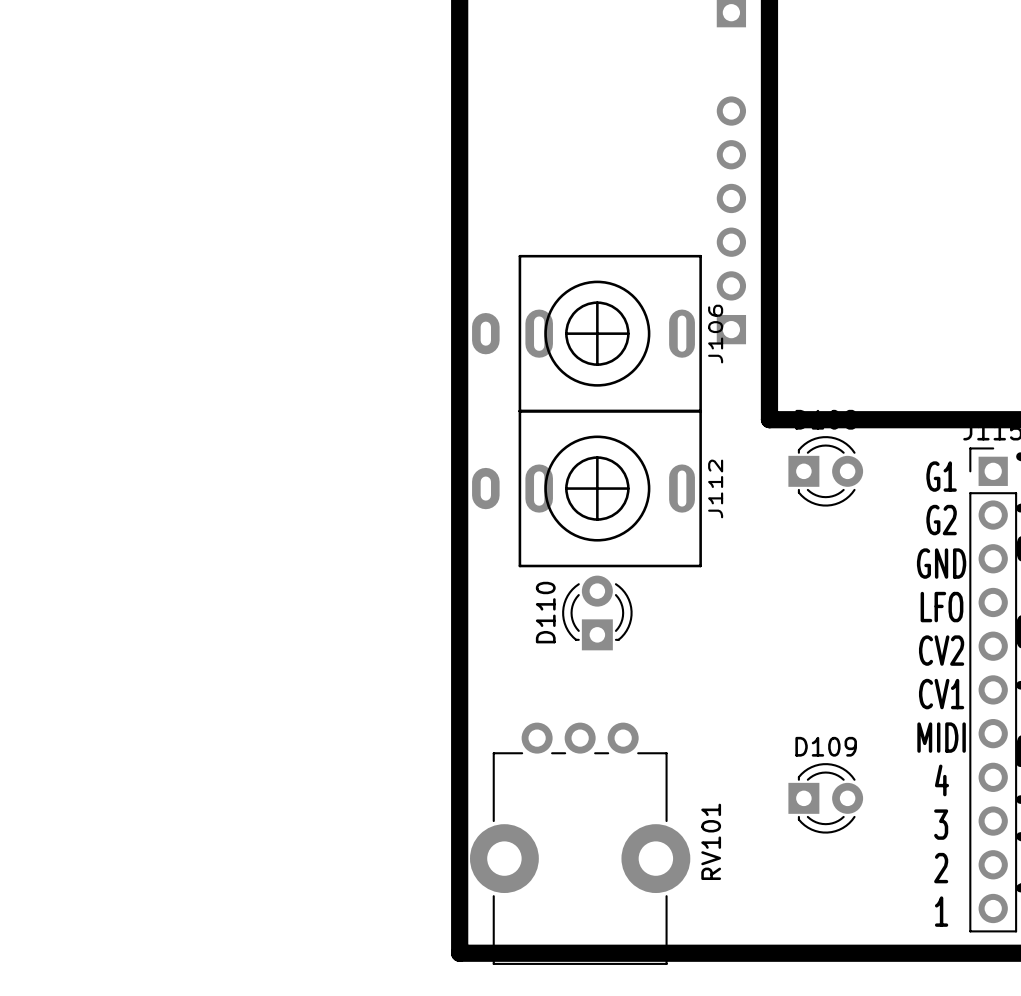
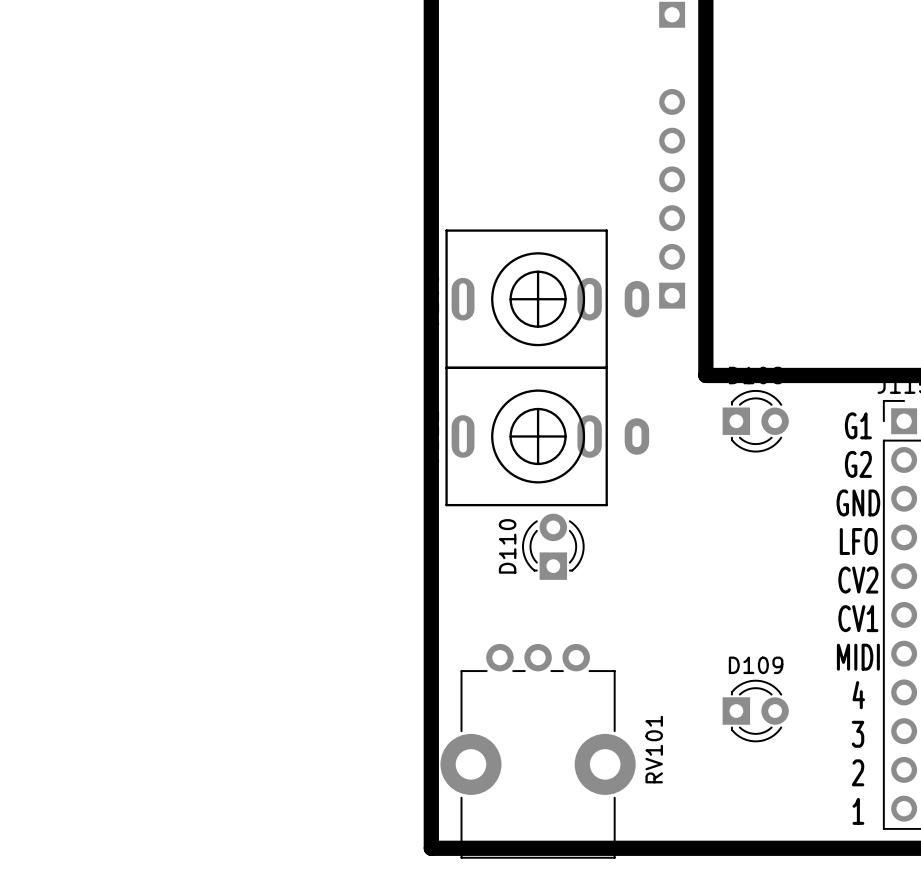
J106 rotation: 0° (586, 333) -> 180° (547, 299)
J112 rotation: 0° (586, 488) -> 180° (547, 436)

